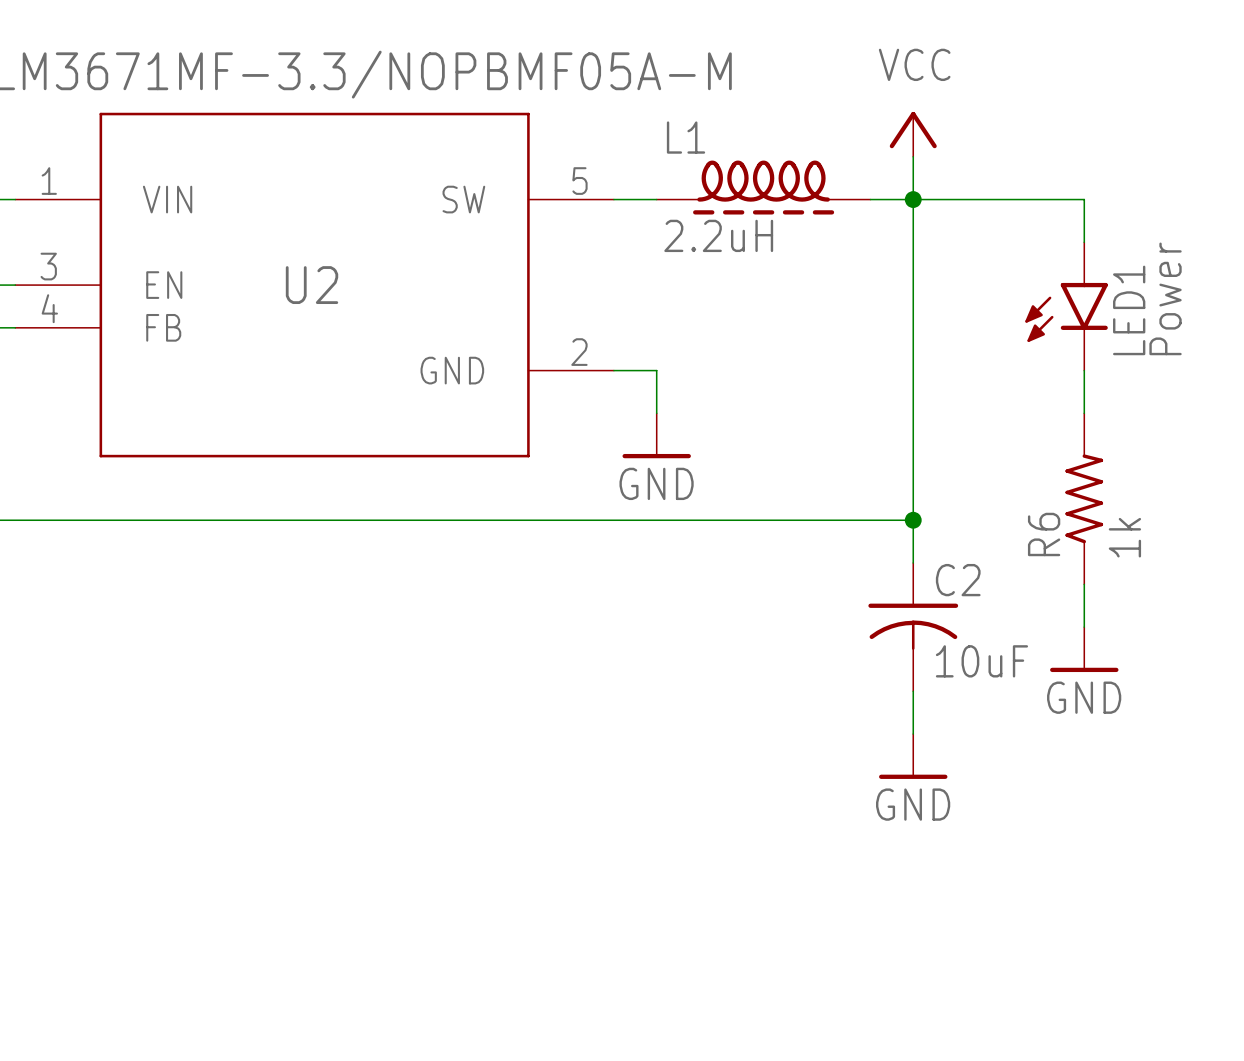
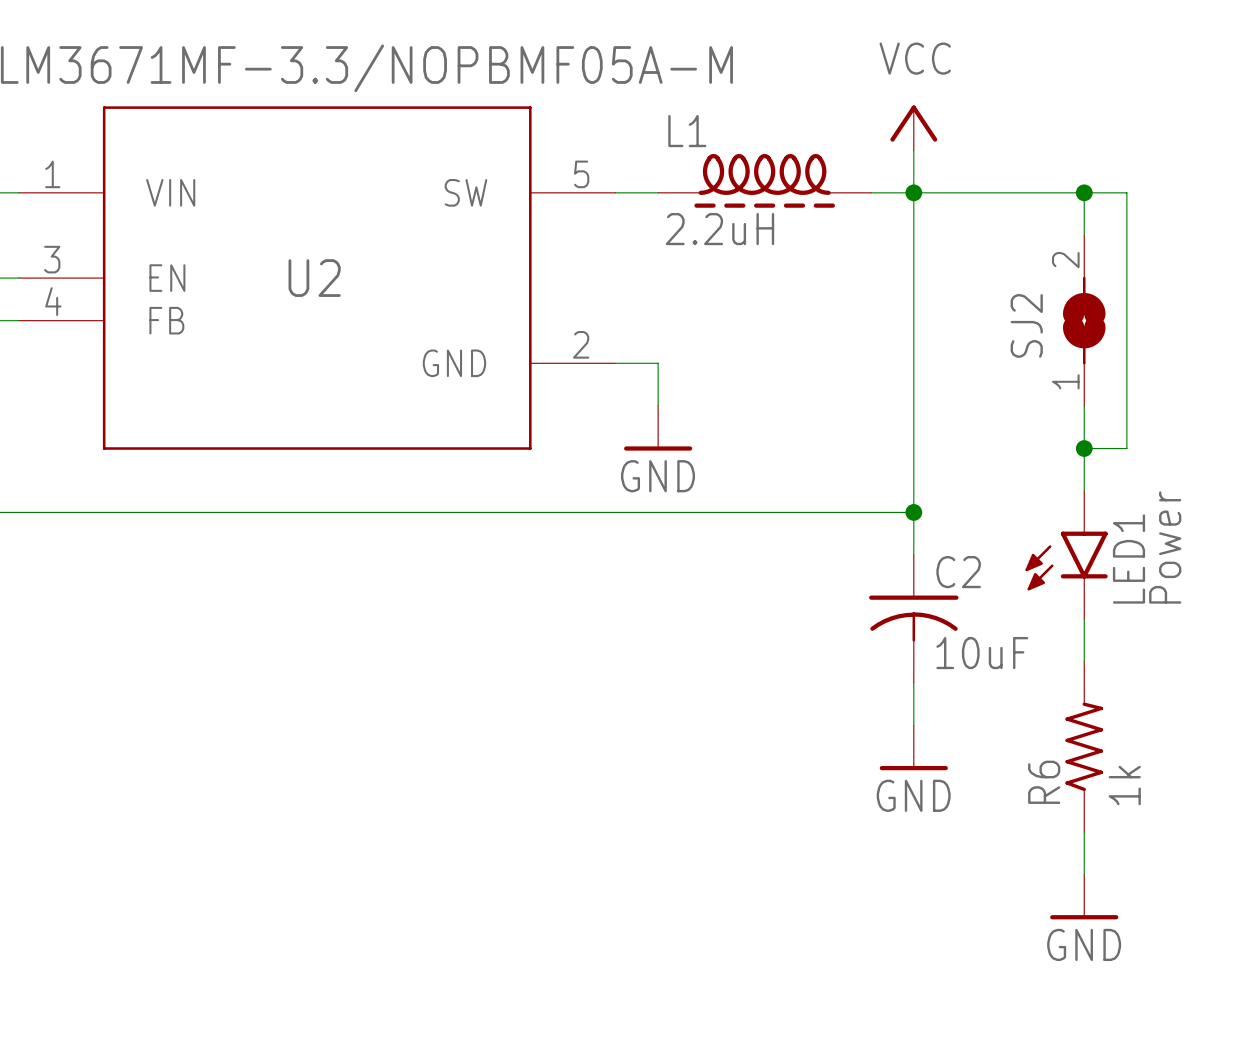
wire: none -> (1084, 192) (1126, 192) (1126, 448) (1084, 448)
junction: none -> (1084, 192)
LED1 position: (1066, 306) -> (1066, 555)
SJ2: none -> (1084, 320)
junction: none -> (1084, 448)
R6 position: (1084, 498) -> (1084, 746)
power symbol position: GND (1084, 649) -> GND (1084, 897)
wire: none -> (1084, 832) (1084, 874)

